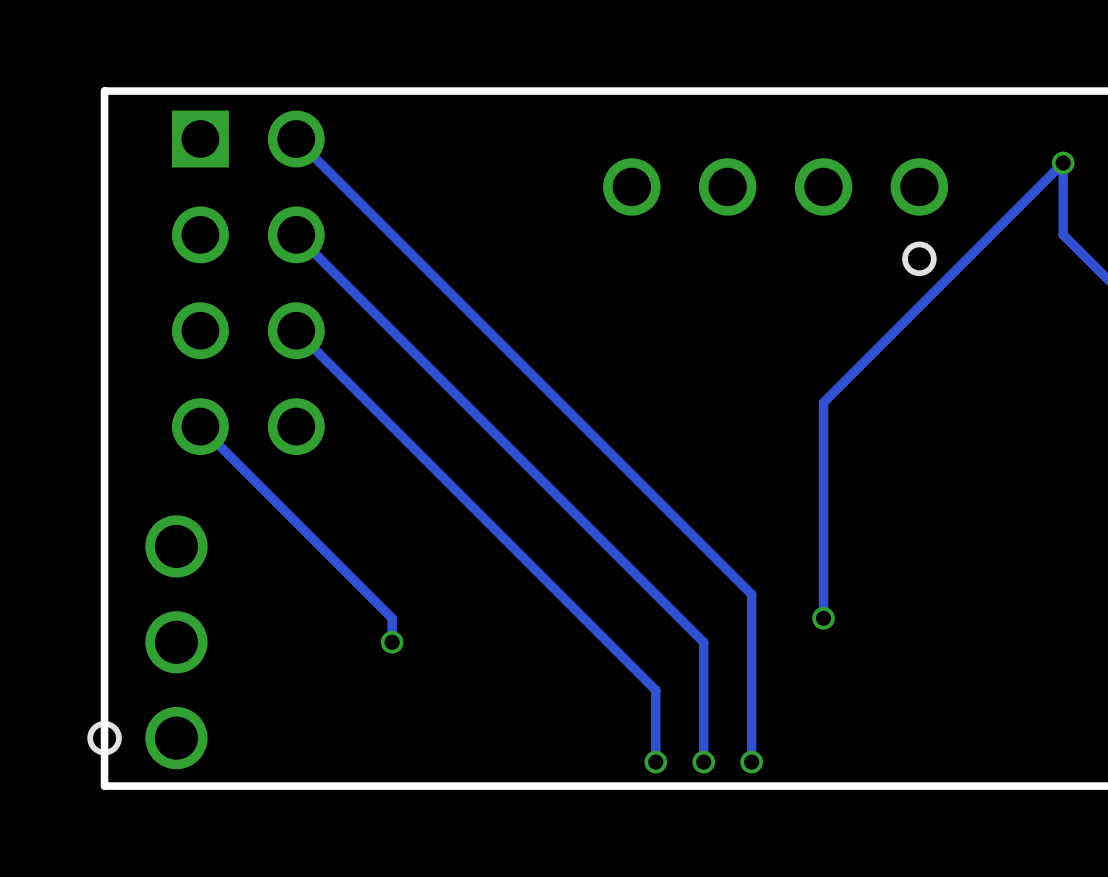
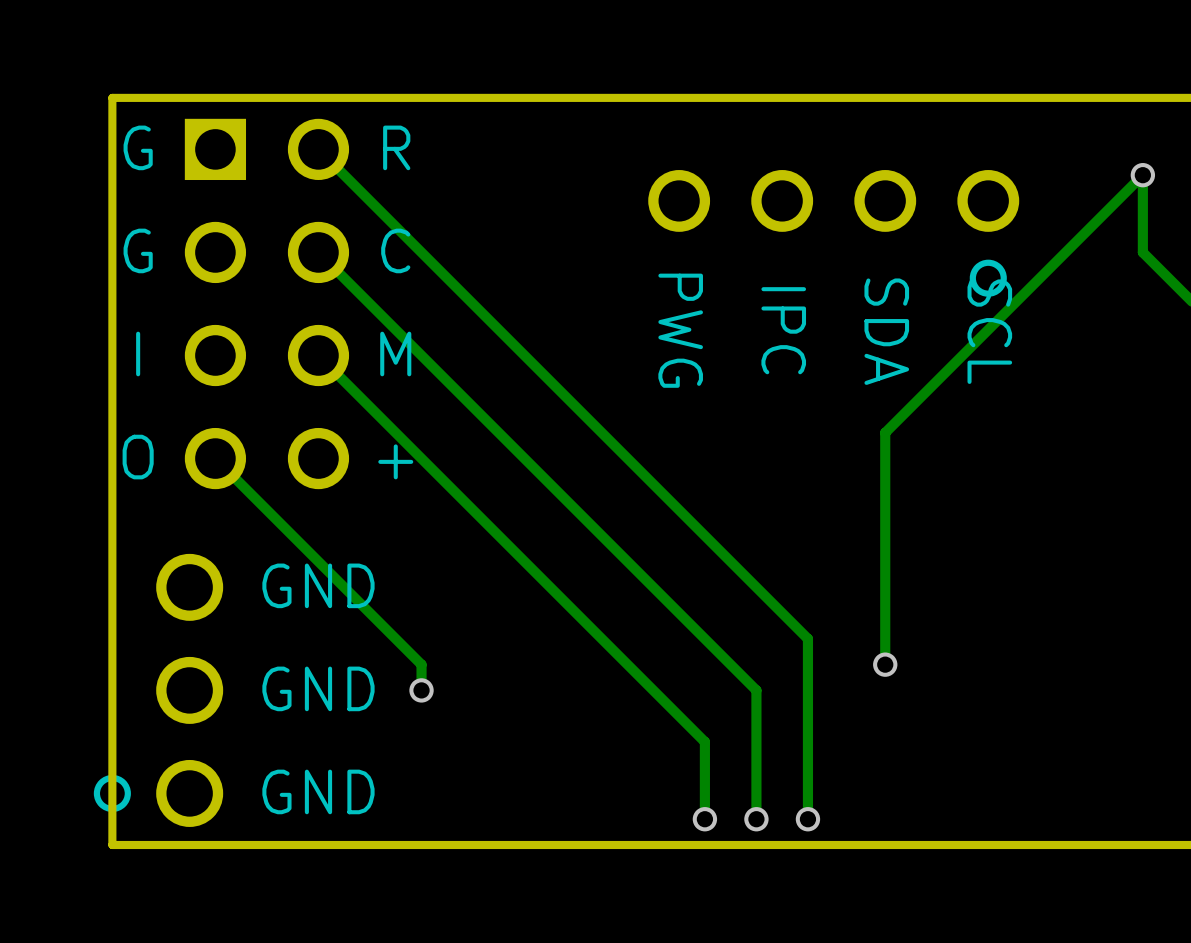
text: none -> G (138, 147)
text: none -> R (396, 147)
text: none -> G (138, 250)
text: none -> C (395, 250)
text: none -> PWG (680, 330)
text: none -> IPC (783, 330)
text: none -> SDA (886, 331)
text: none -> SCL (989, 331)
text: none -> I (138, 353)
text: none -> M (395, 353)
text: none -> O (138, 457)
text: none -> + (395, 461)
text: none -> GND (318, 585)
text: none -> GND (318, 688)
text: none -> GND (318, 791)

